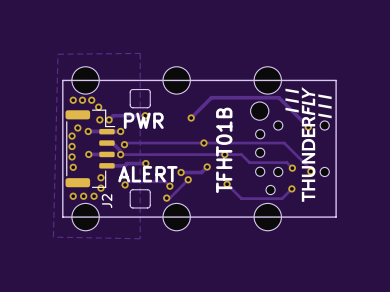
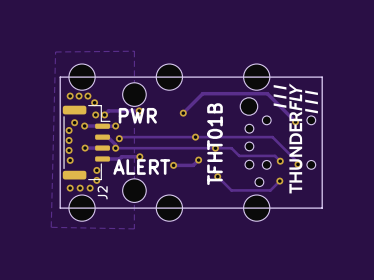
part footprint: [129, 89, 151, 108] -> [122, 82, 147, 107]
track: (188, 179) (169, 198) (166, 198) -> none
via: (188, 179) -> none
track: (125, 184) (128, 181) (165, 181) (169, 186) -> none
via: (125, 184) -> none
via: (169, 186) -> none
part footprint: [129, 189, 151, 209] -> [122, 178, 147, 203]
via: (166, 198) -> none

